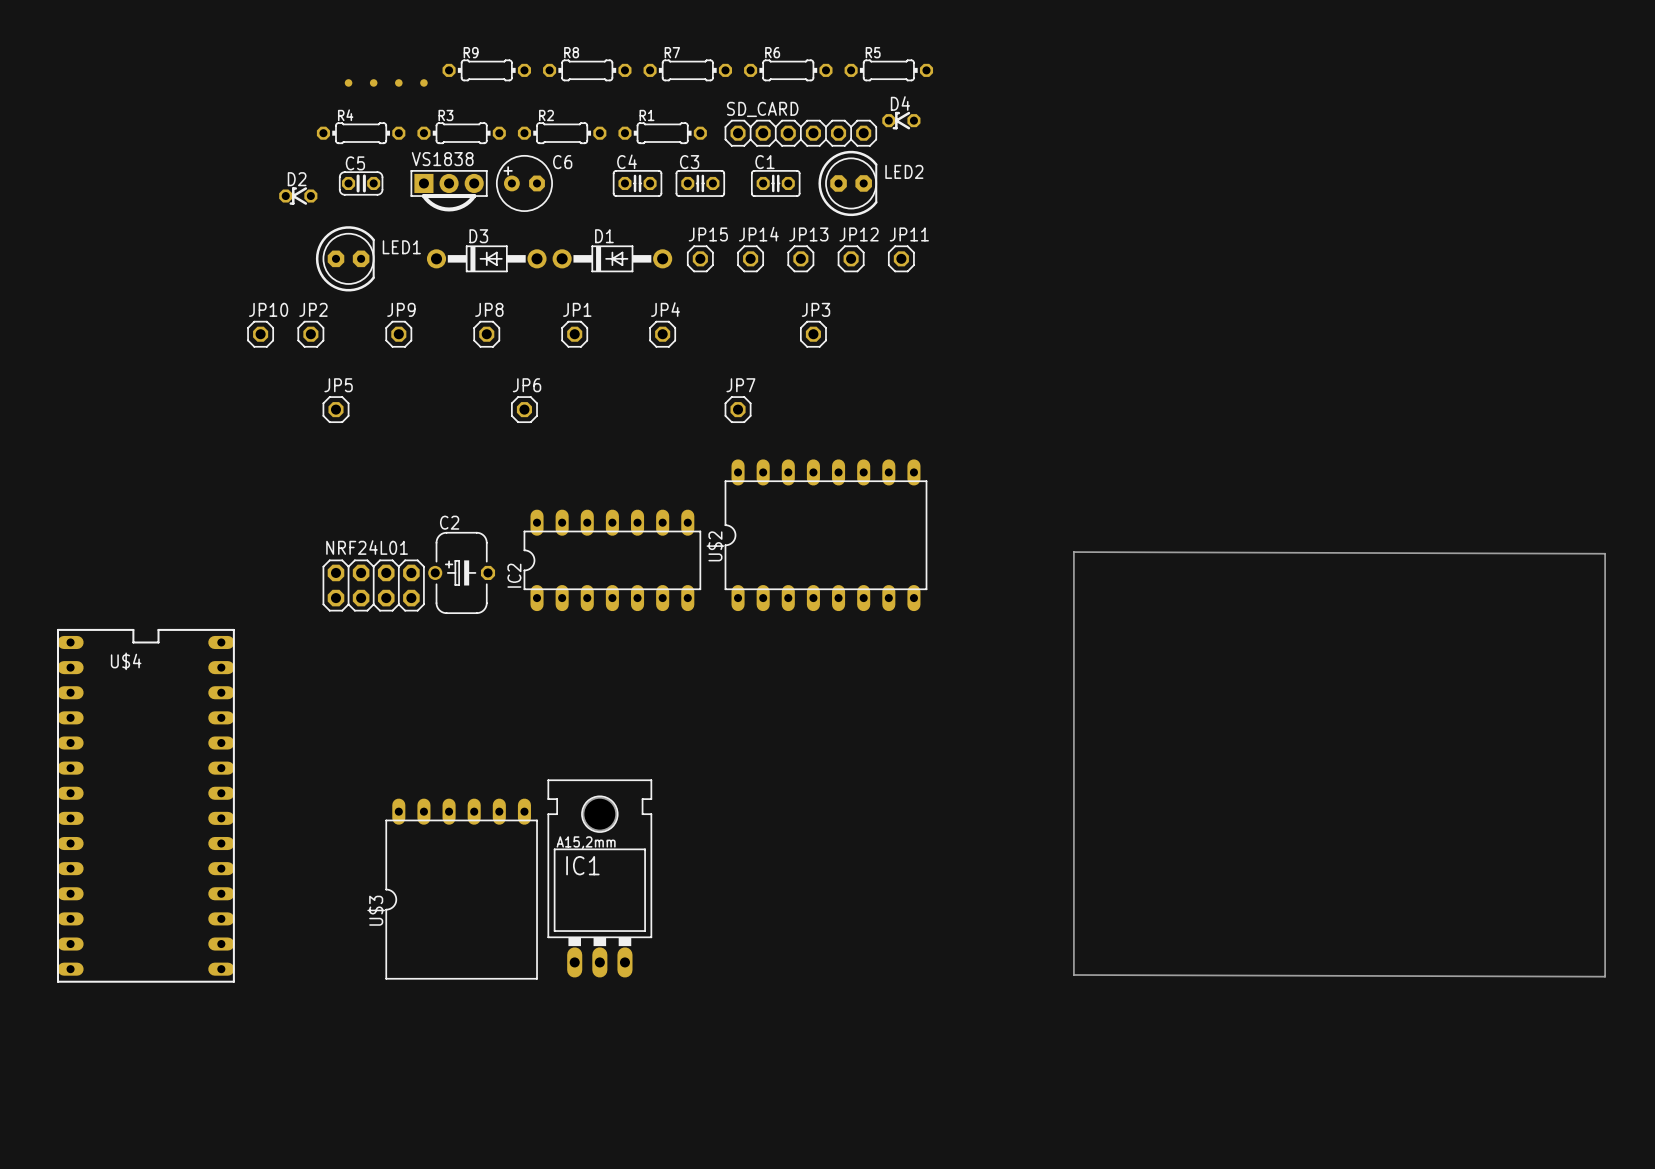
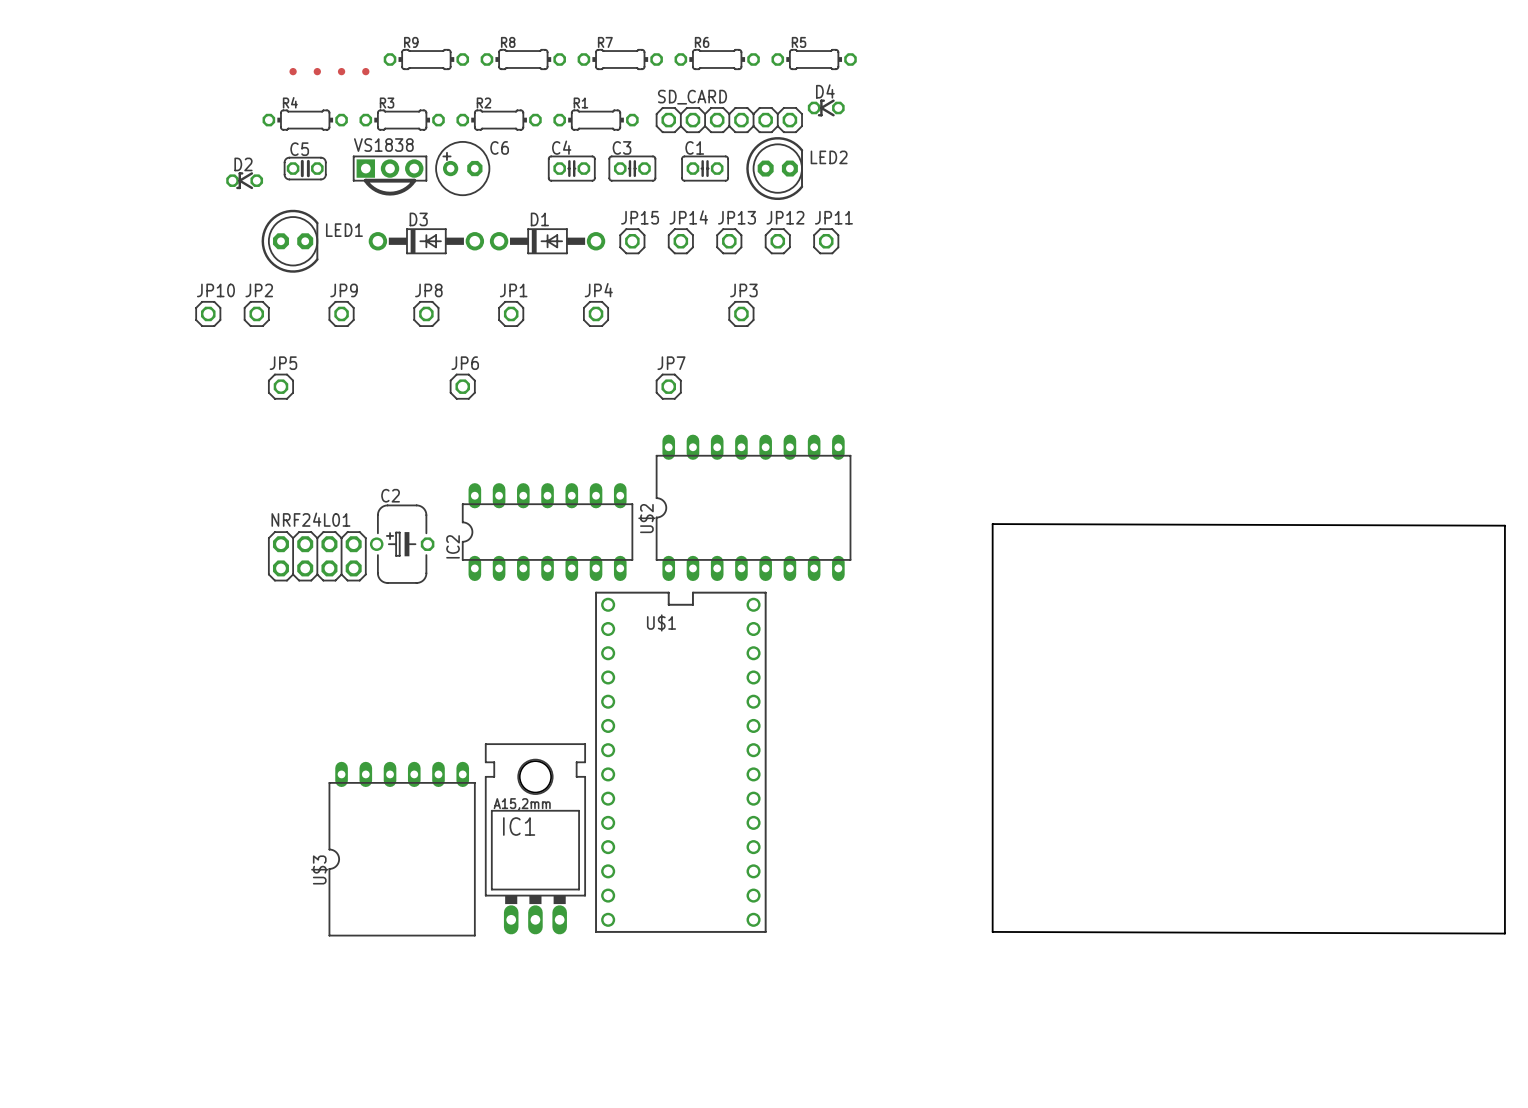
U$1: none -> (680, 762)
U$4: (145, 805) -> none

